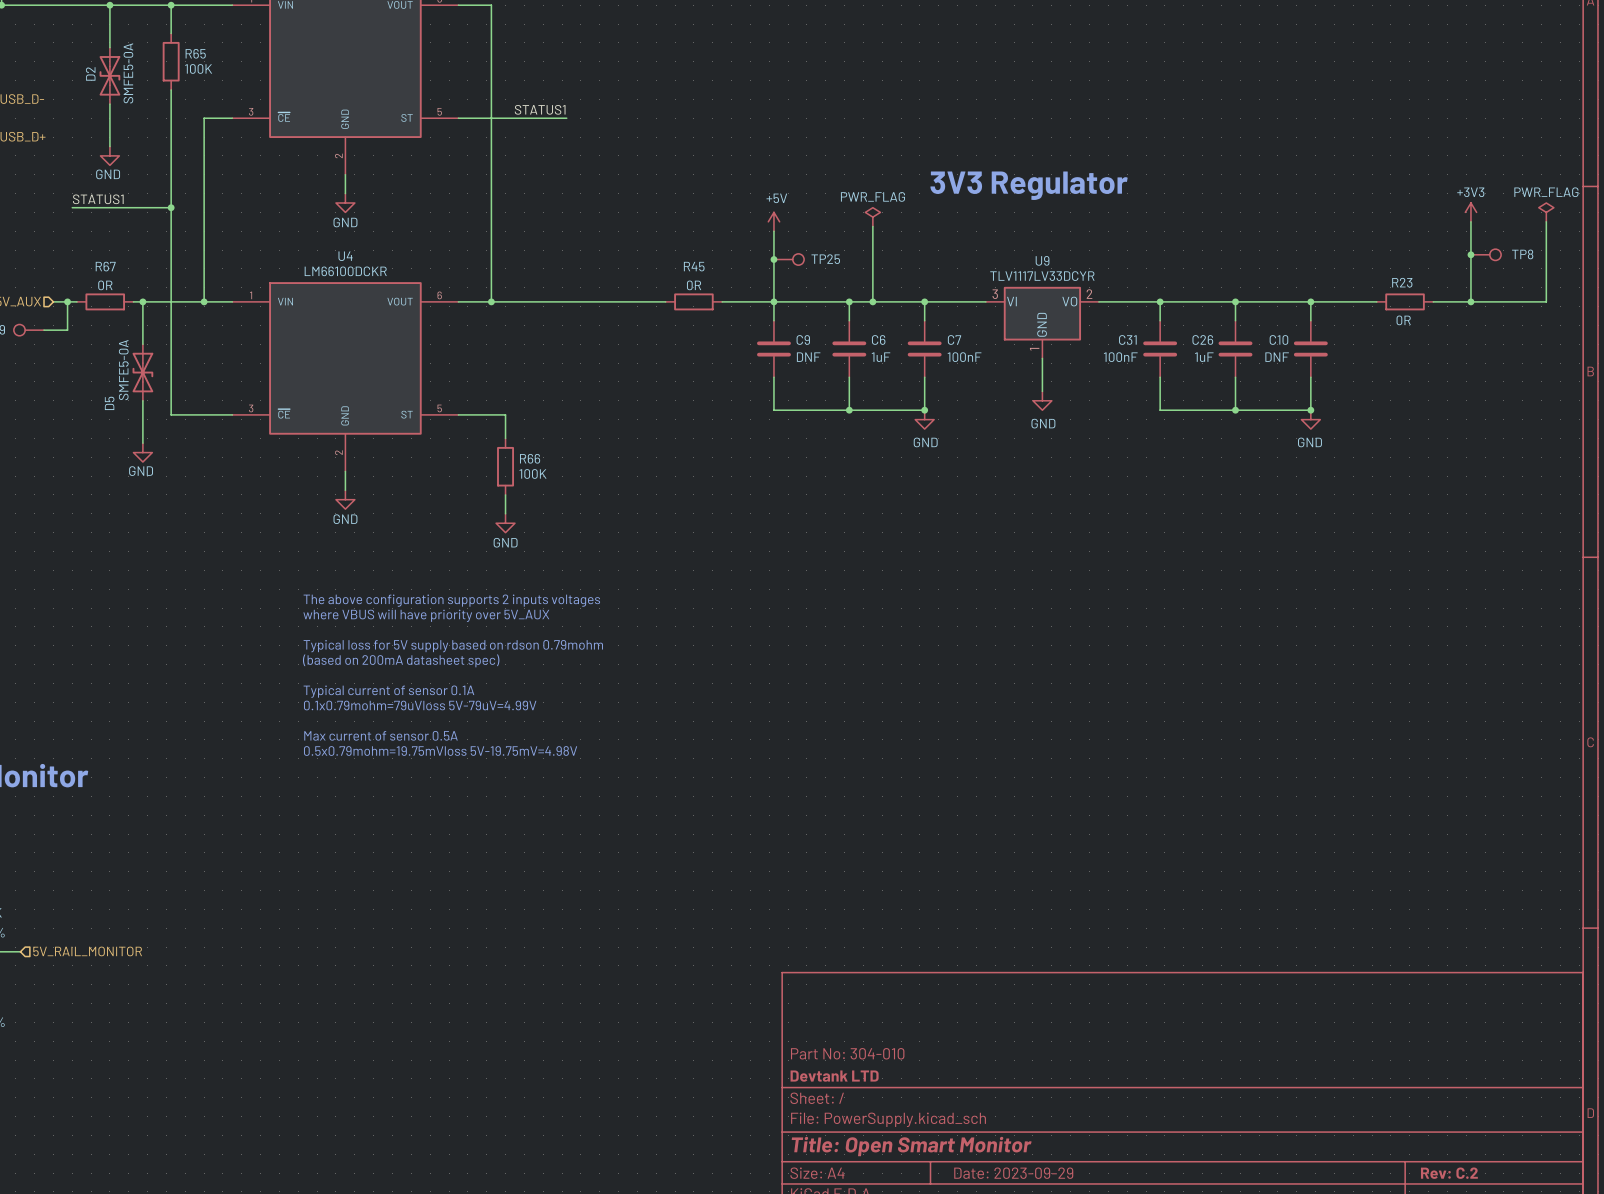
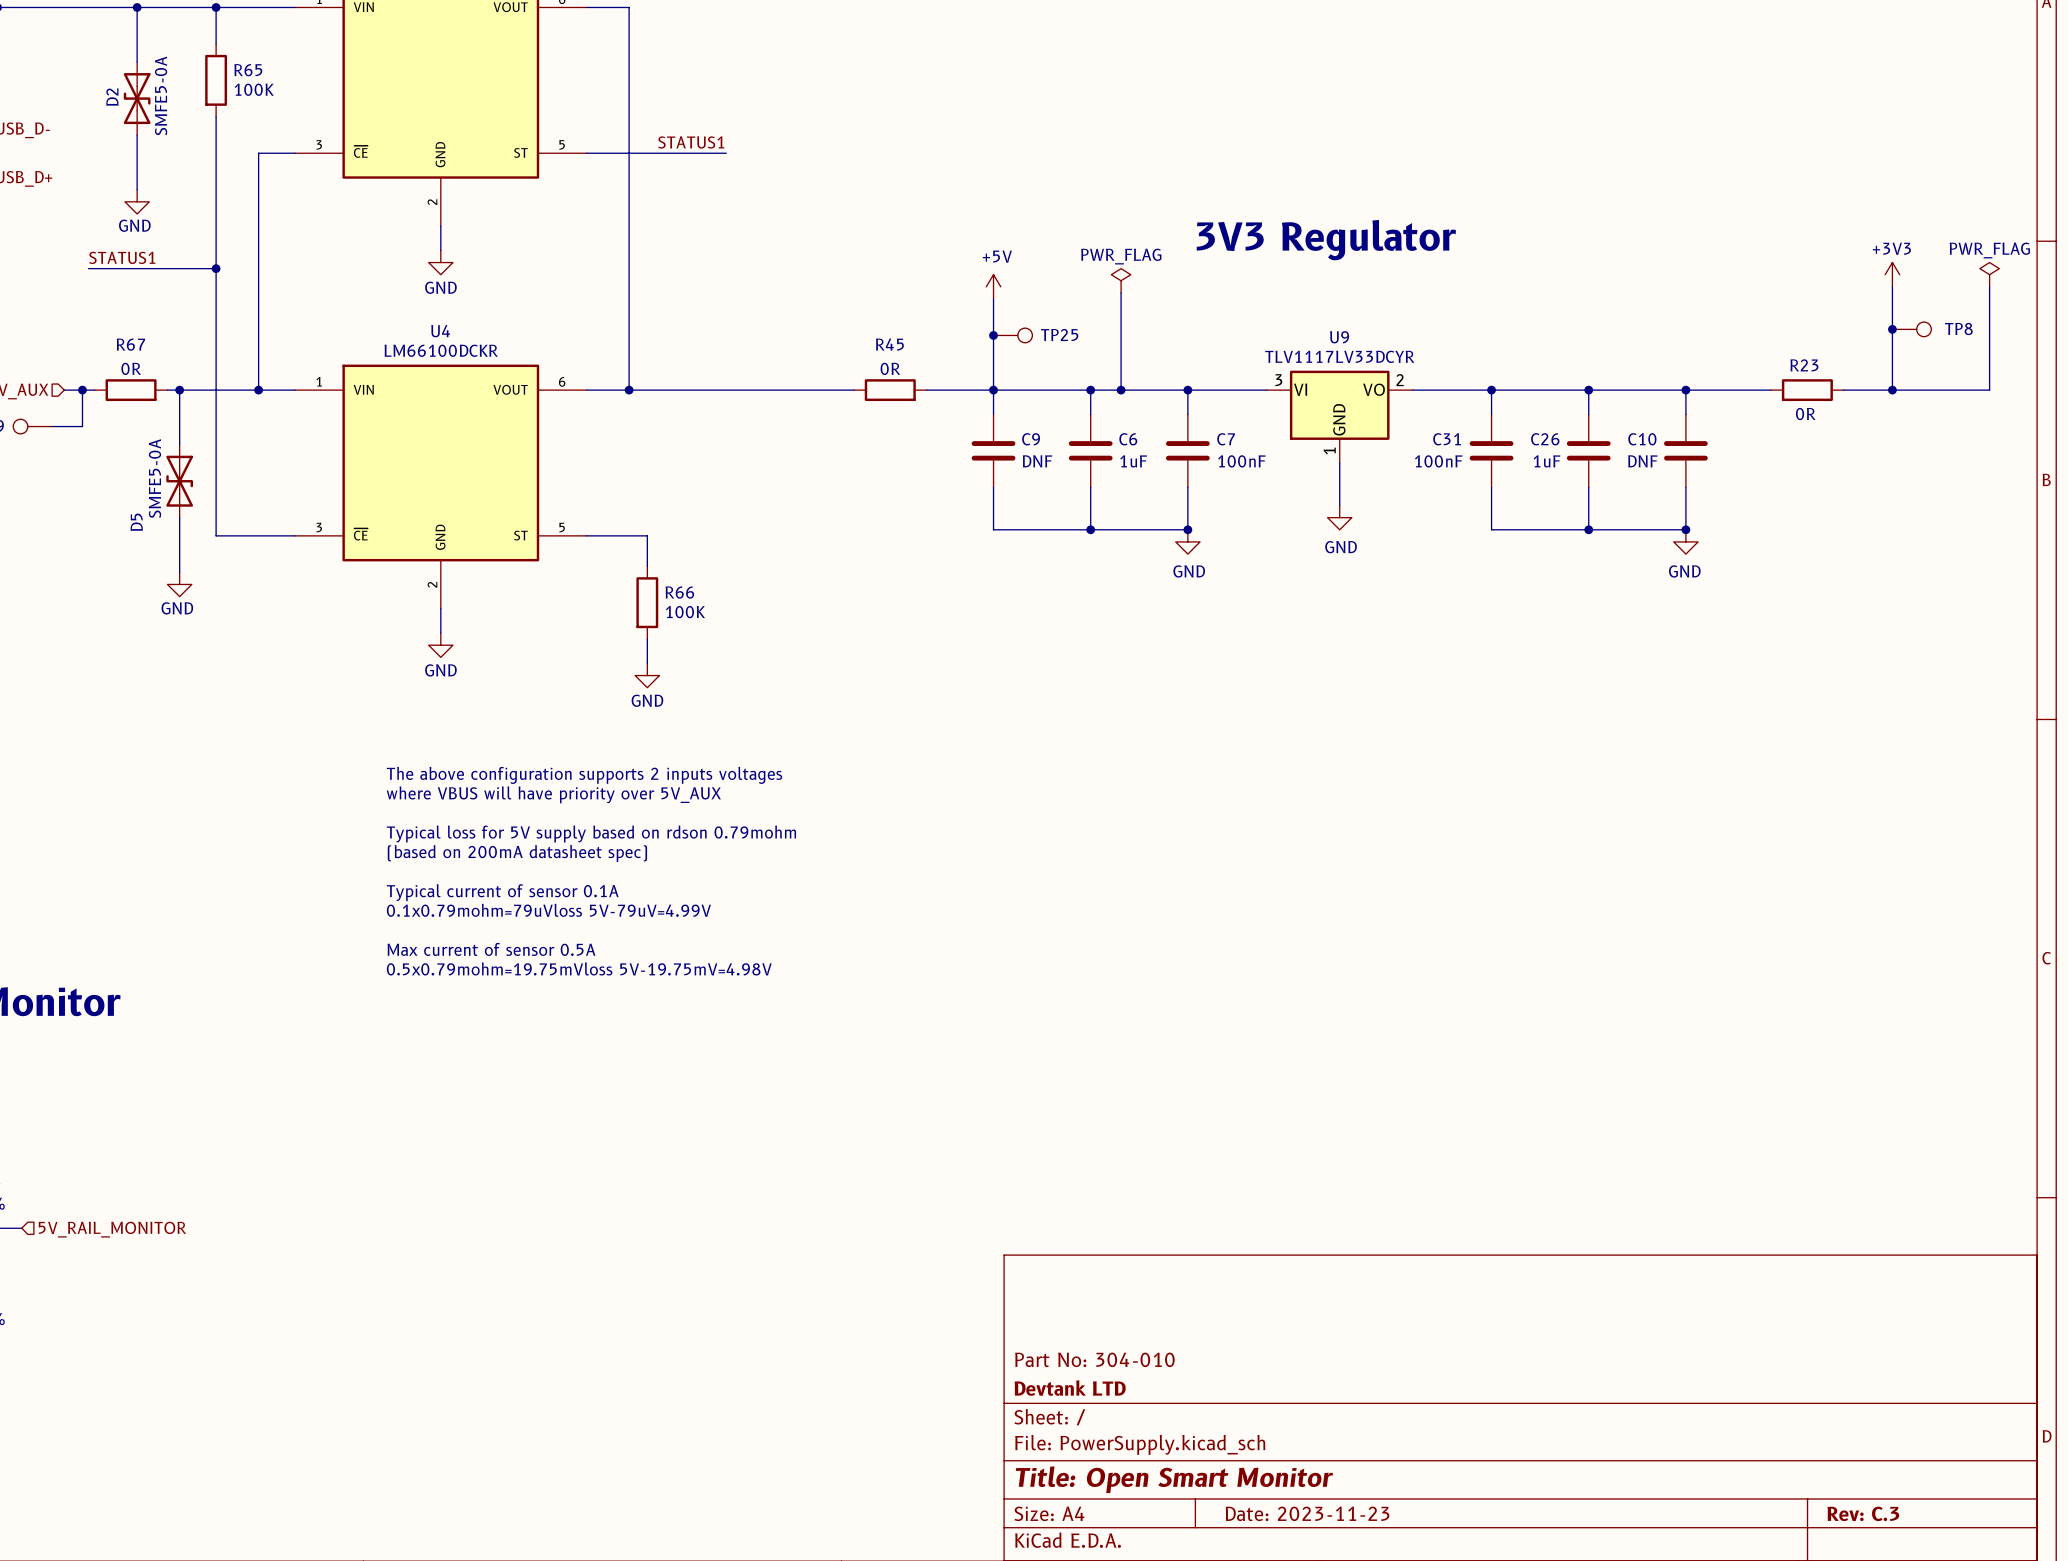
title block: Date: 2023-09-29 (1013, 1173) -> Date: 2023-11-23 (1307, 1513)
title block: Rev: C.2 (1449, 1173) -> Rev: C.3 (1863, 1513)

